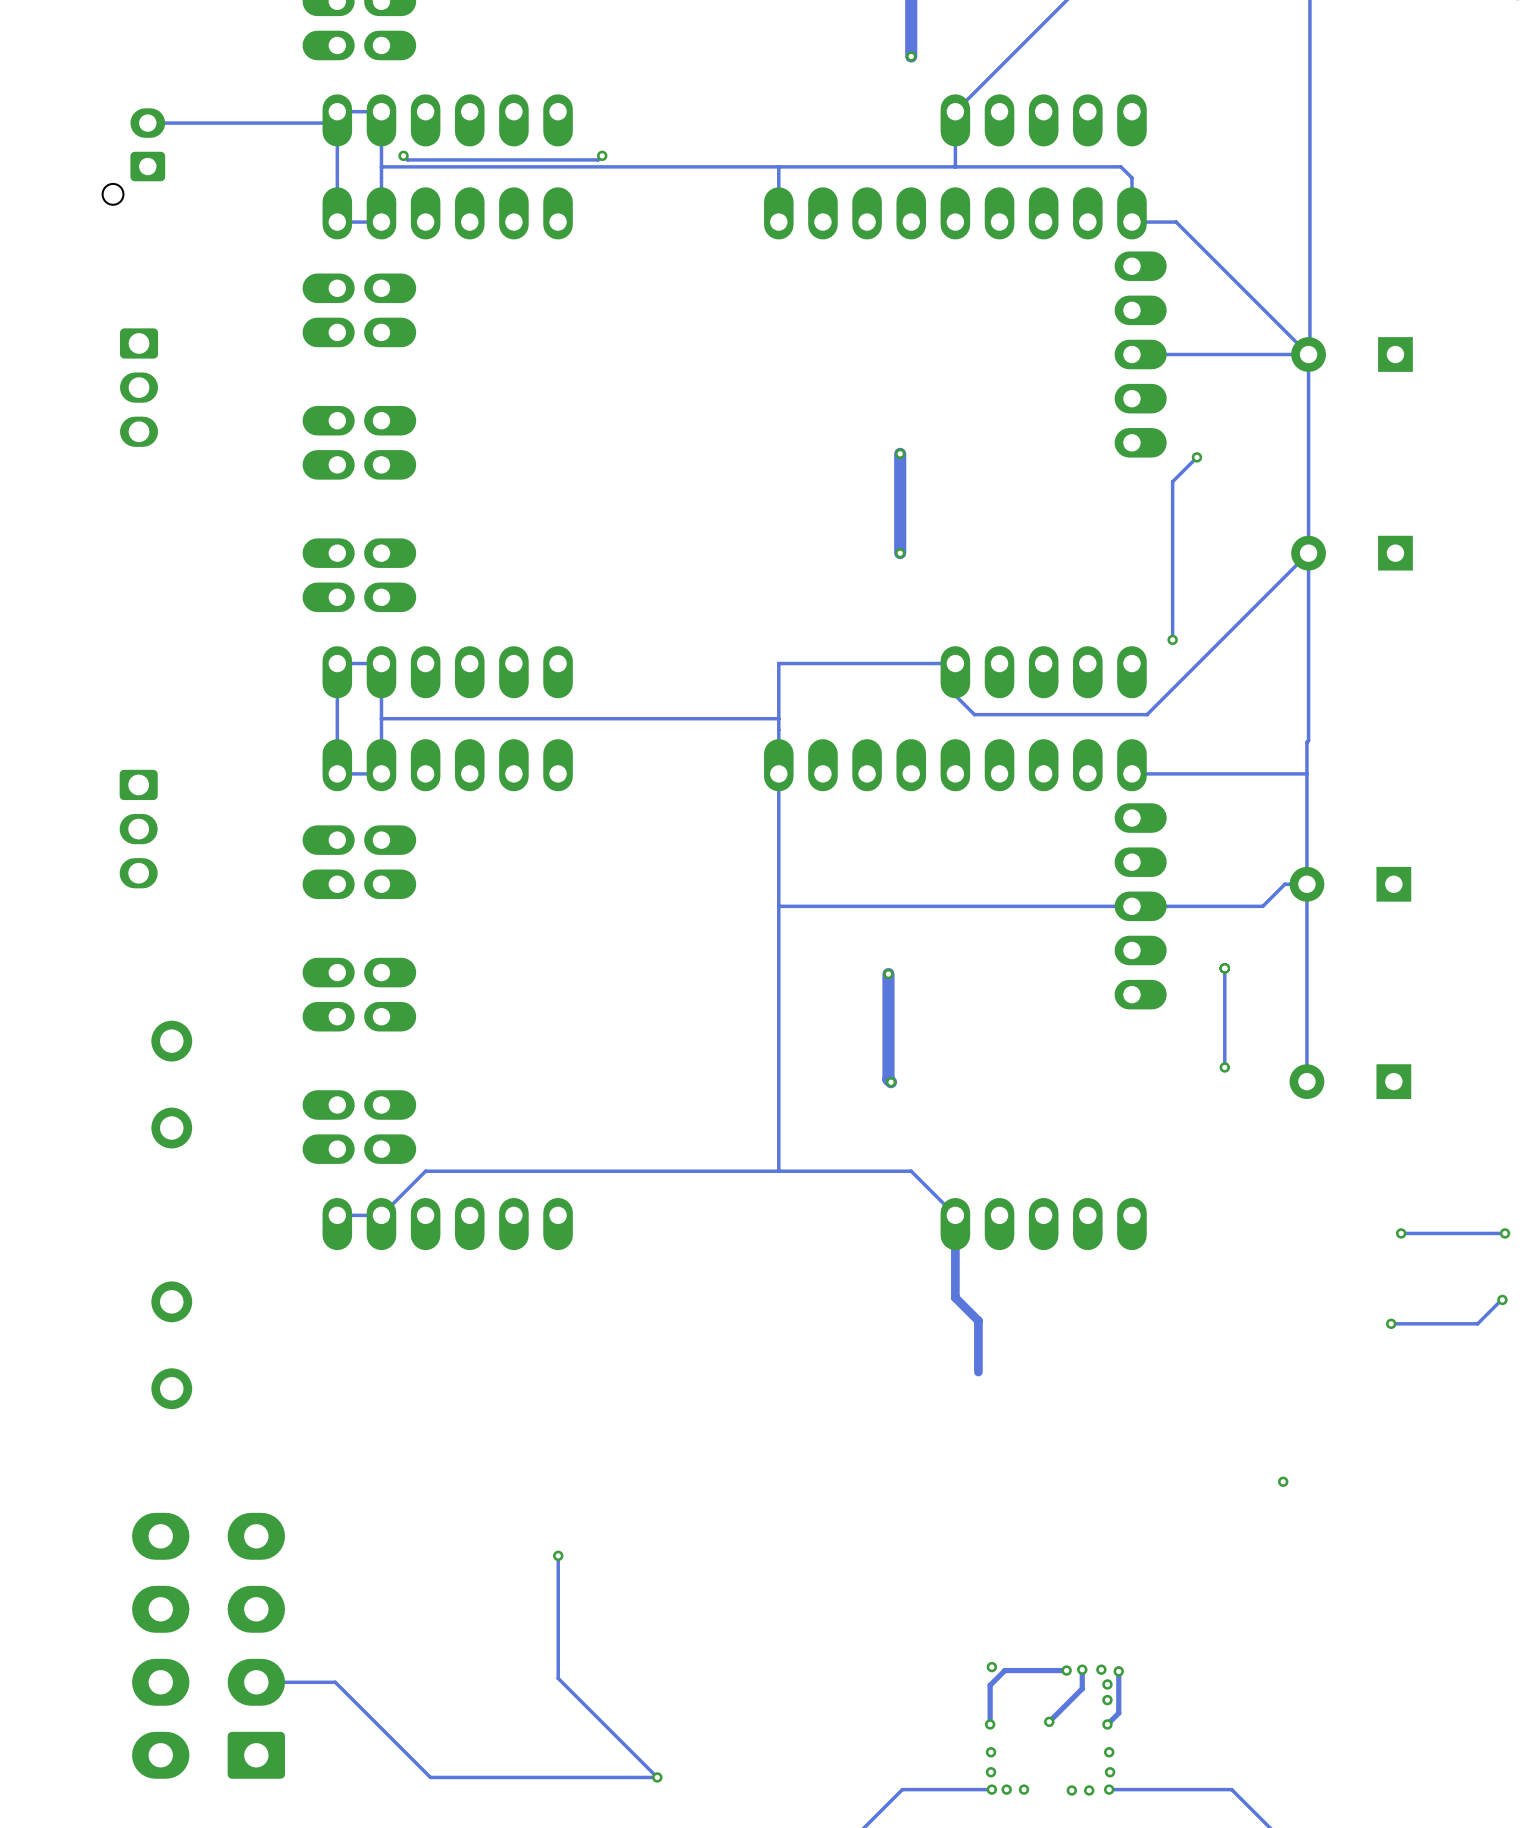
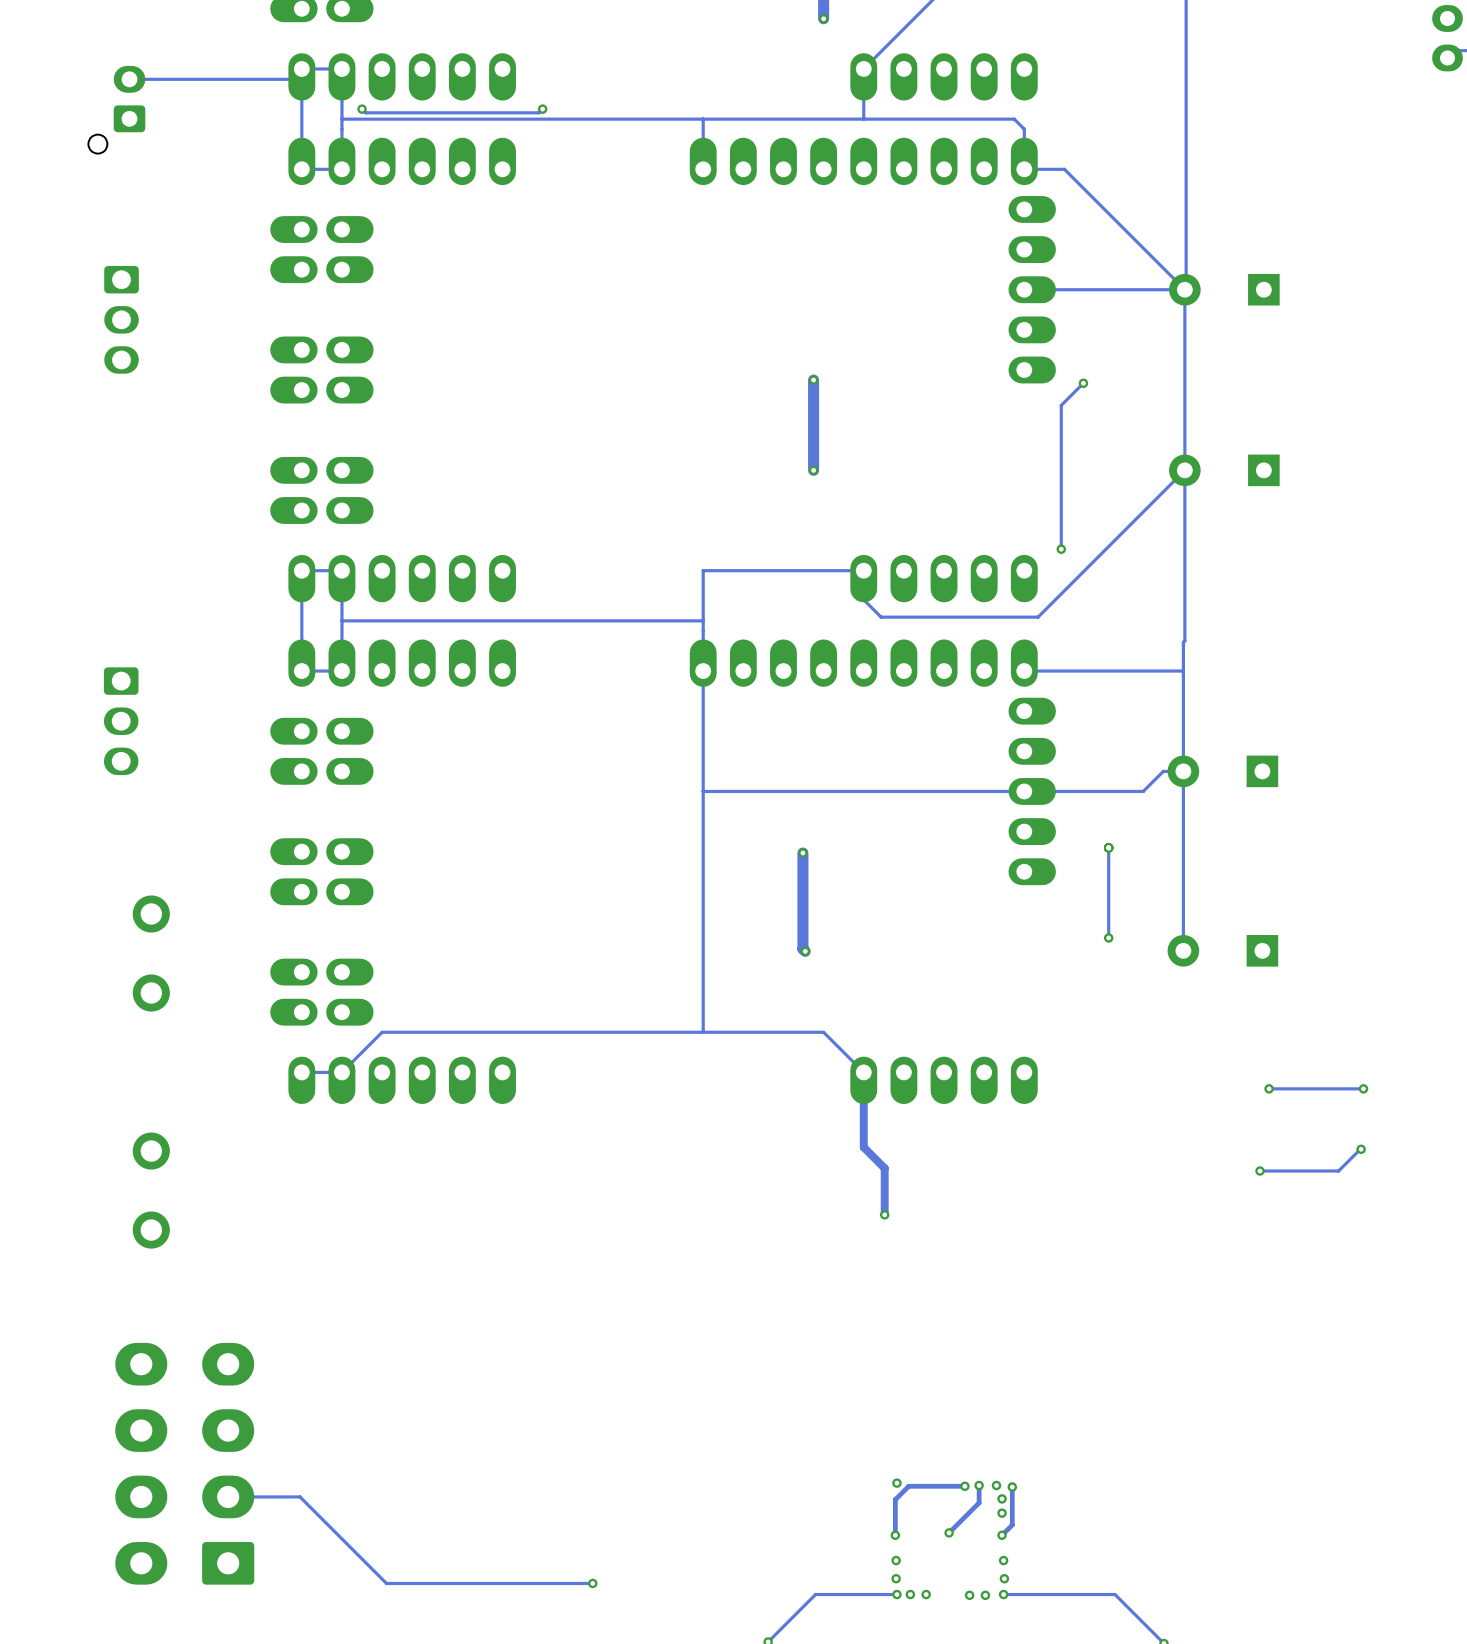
via: none -> (884, 1214)
via: (1283, 1481) -> none
track: (558, 1555) (558, 1678) (657, 1777) -> none
via: (558, 1555) -> none

